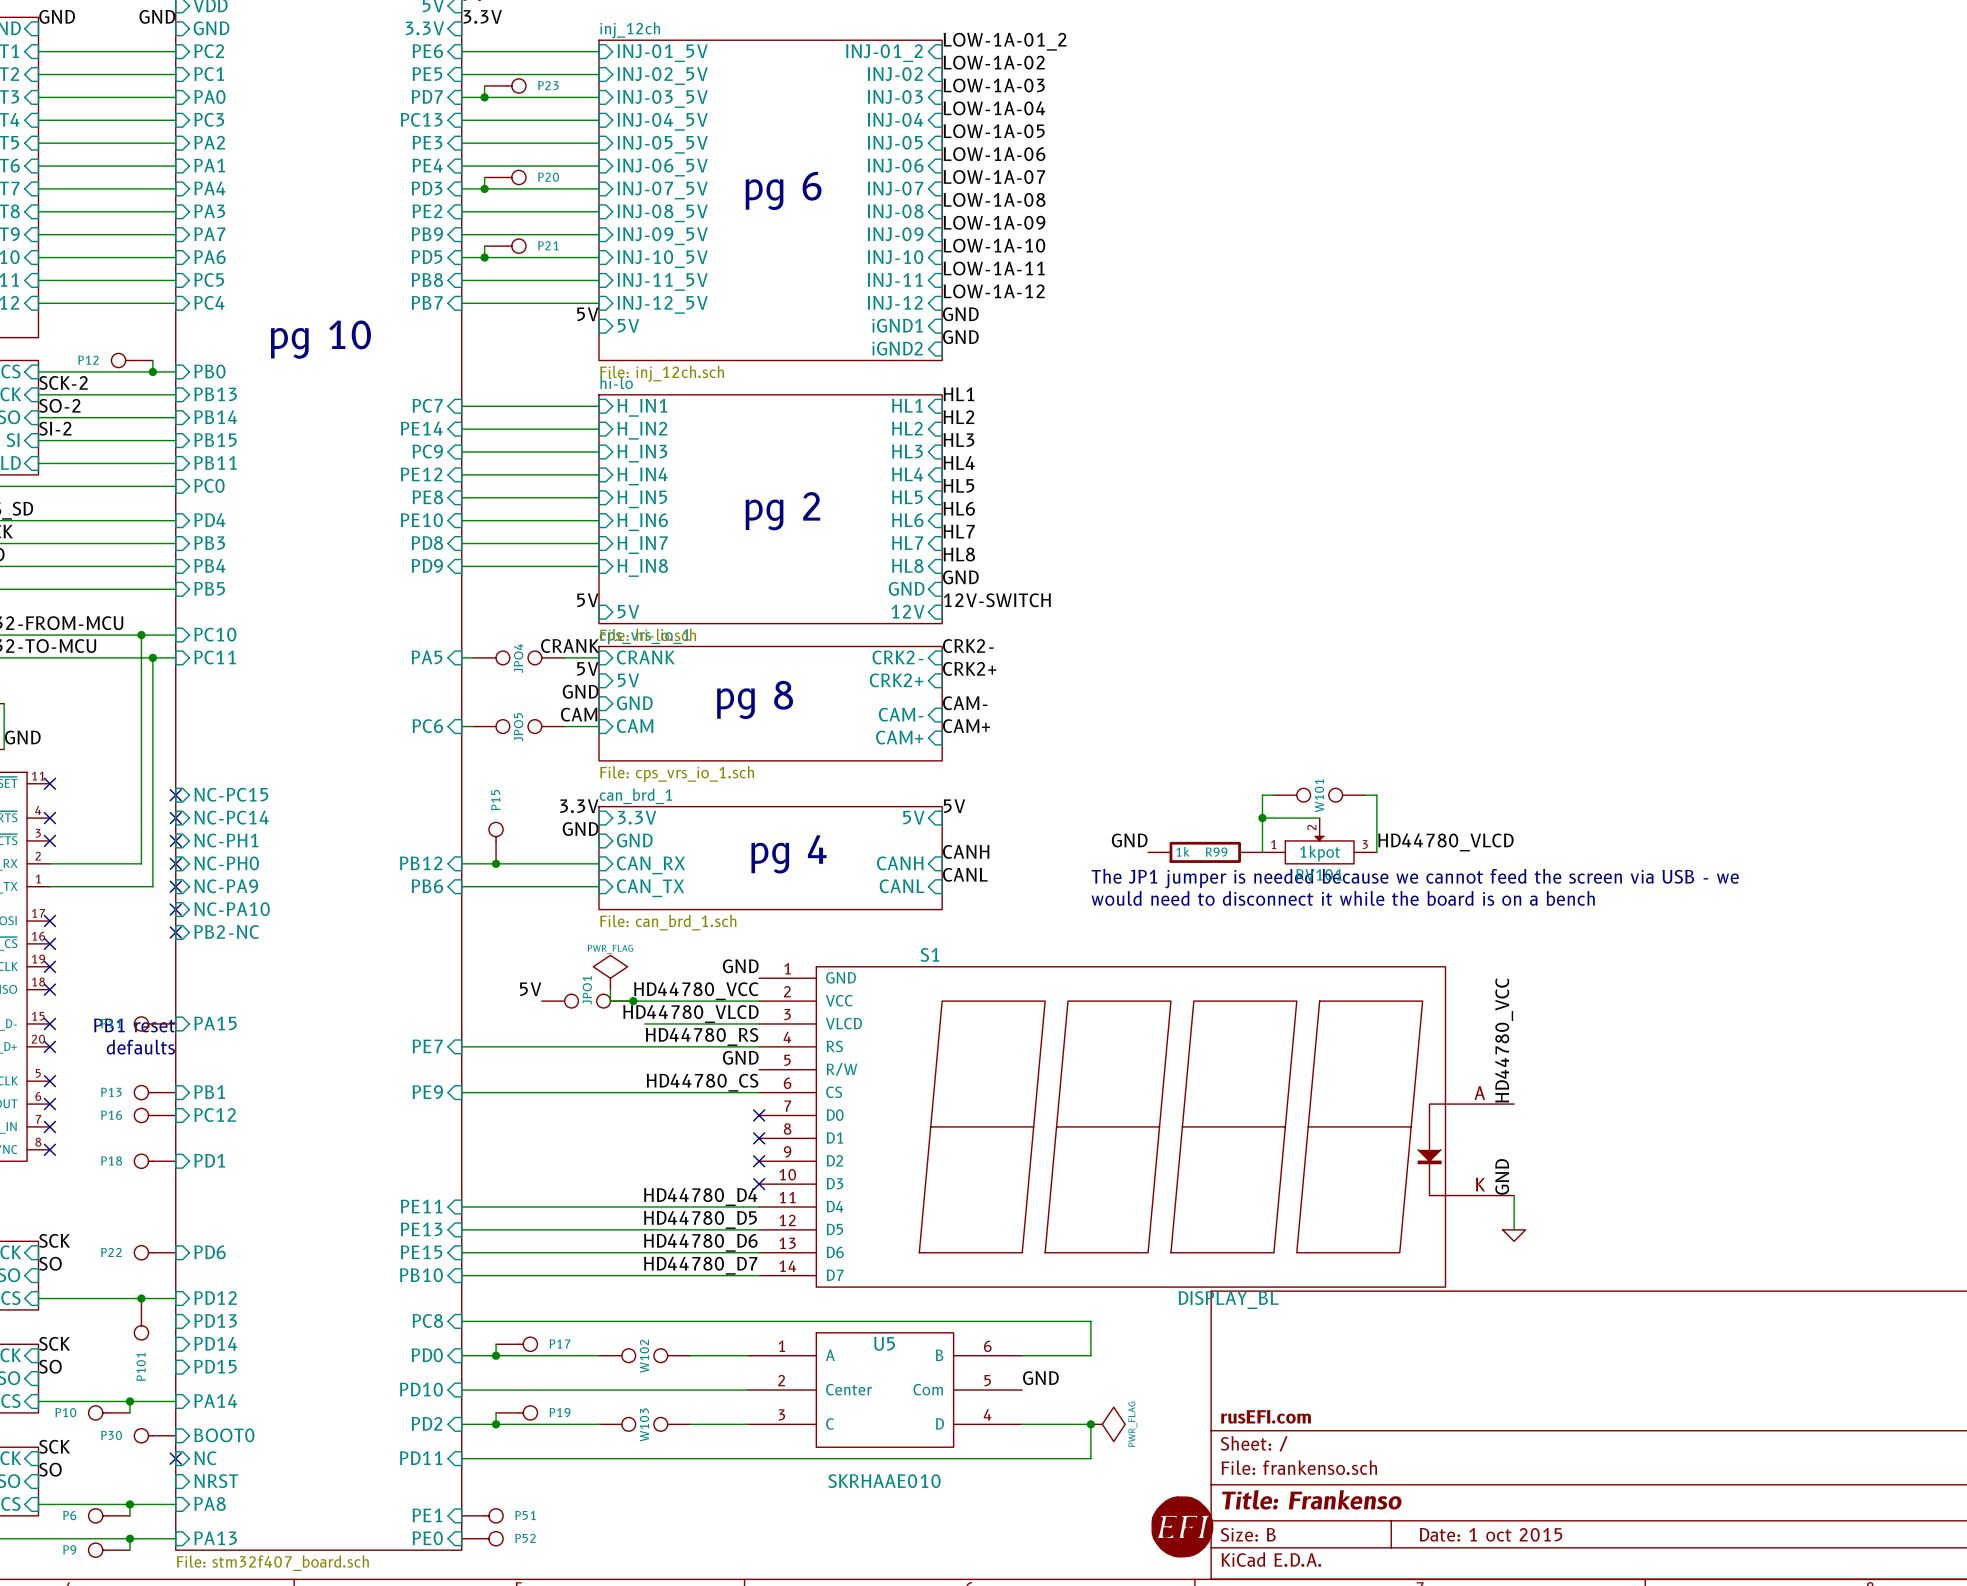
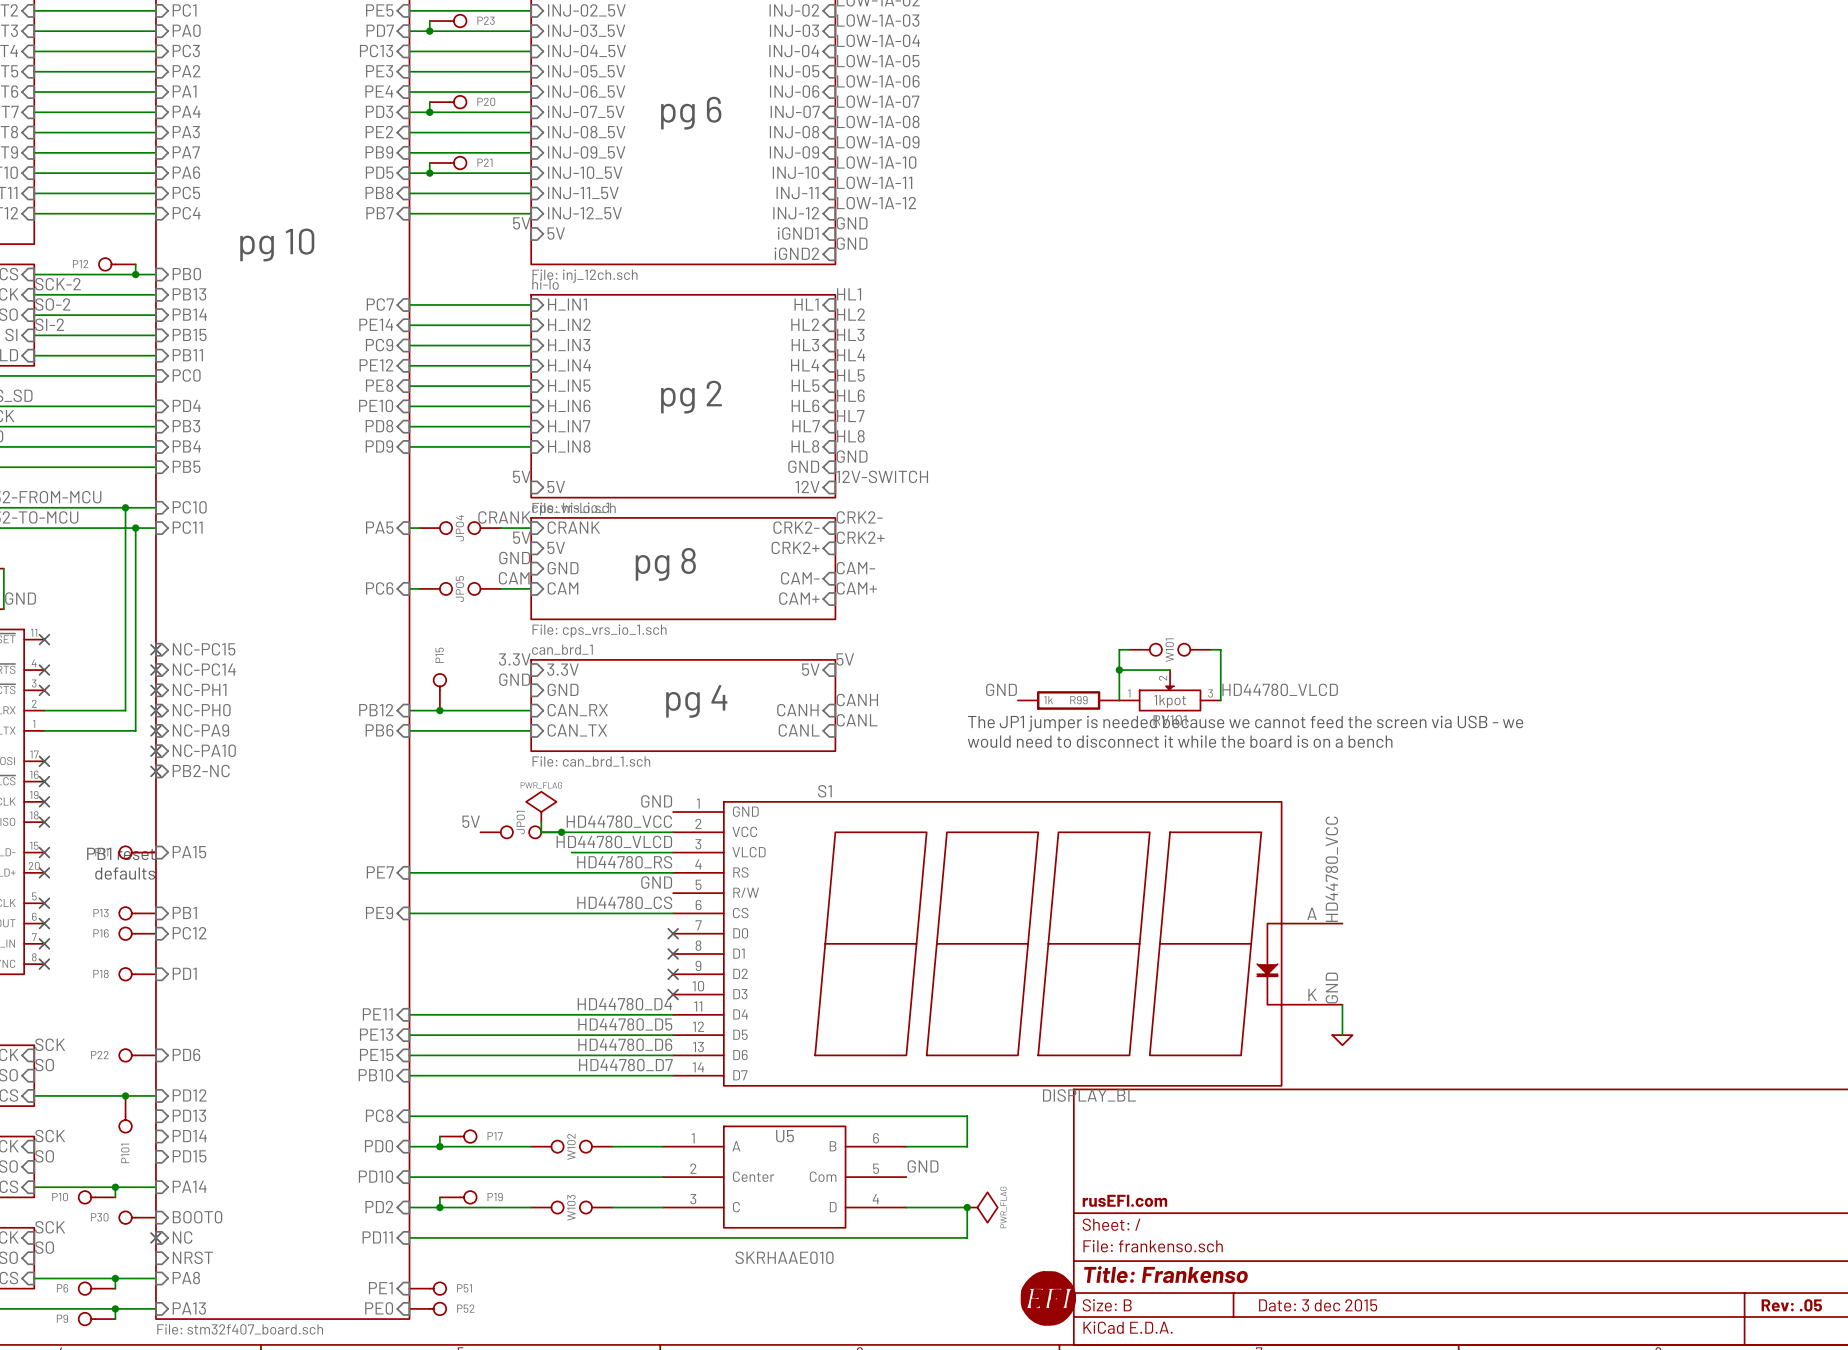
title block: Date: 1 oct 2015 (1491, 1534) -> Date: 3 dec 2015 (1318, 1305)

